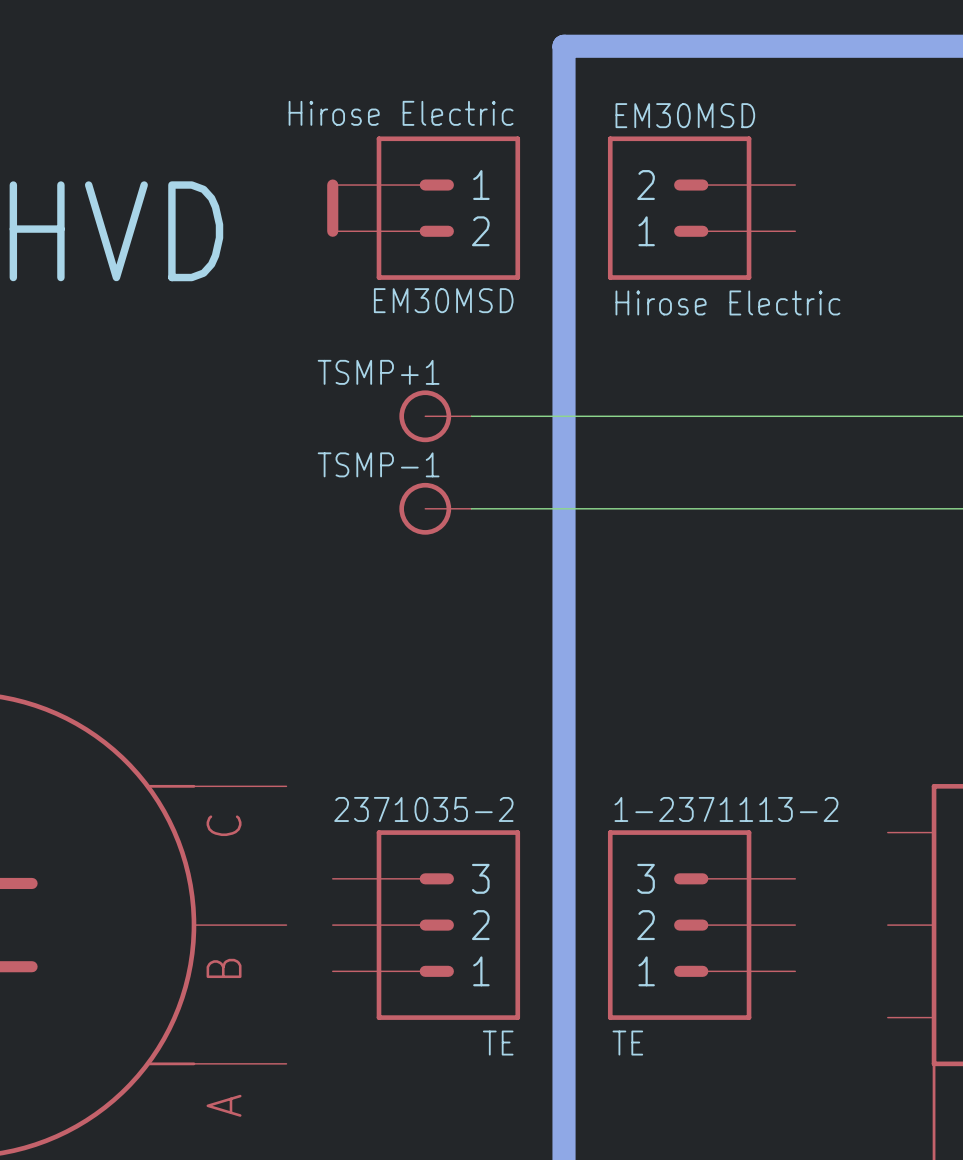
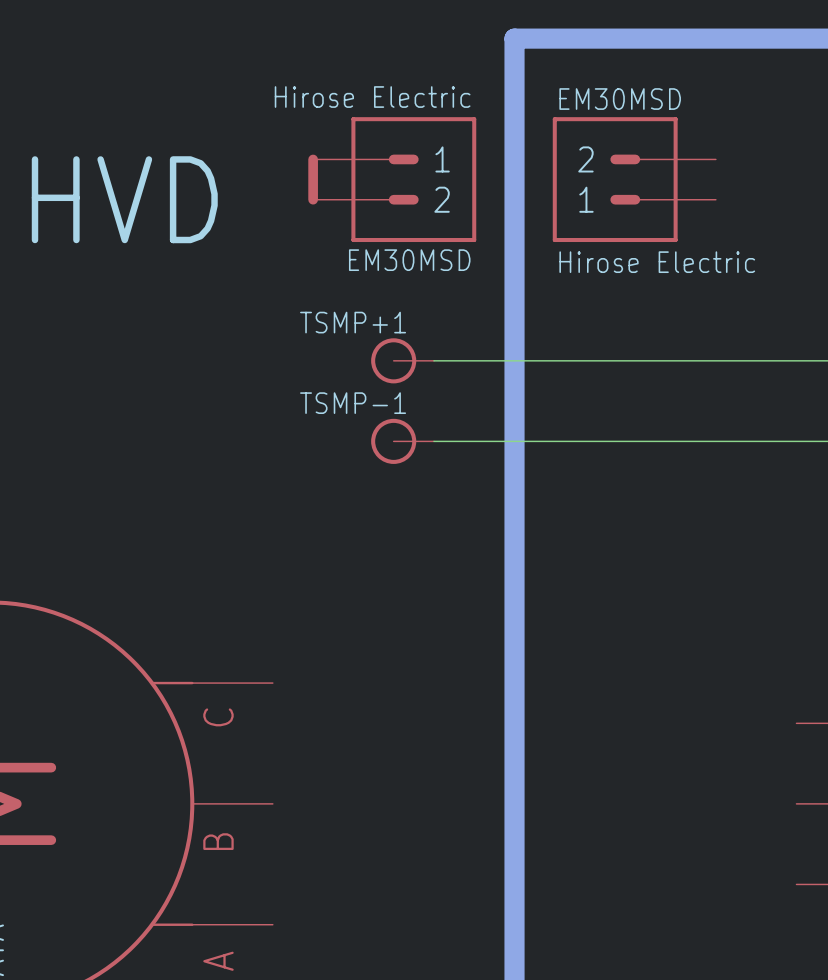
part: (426, 925) -> none
part: (701, 925) -> none

